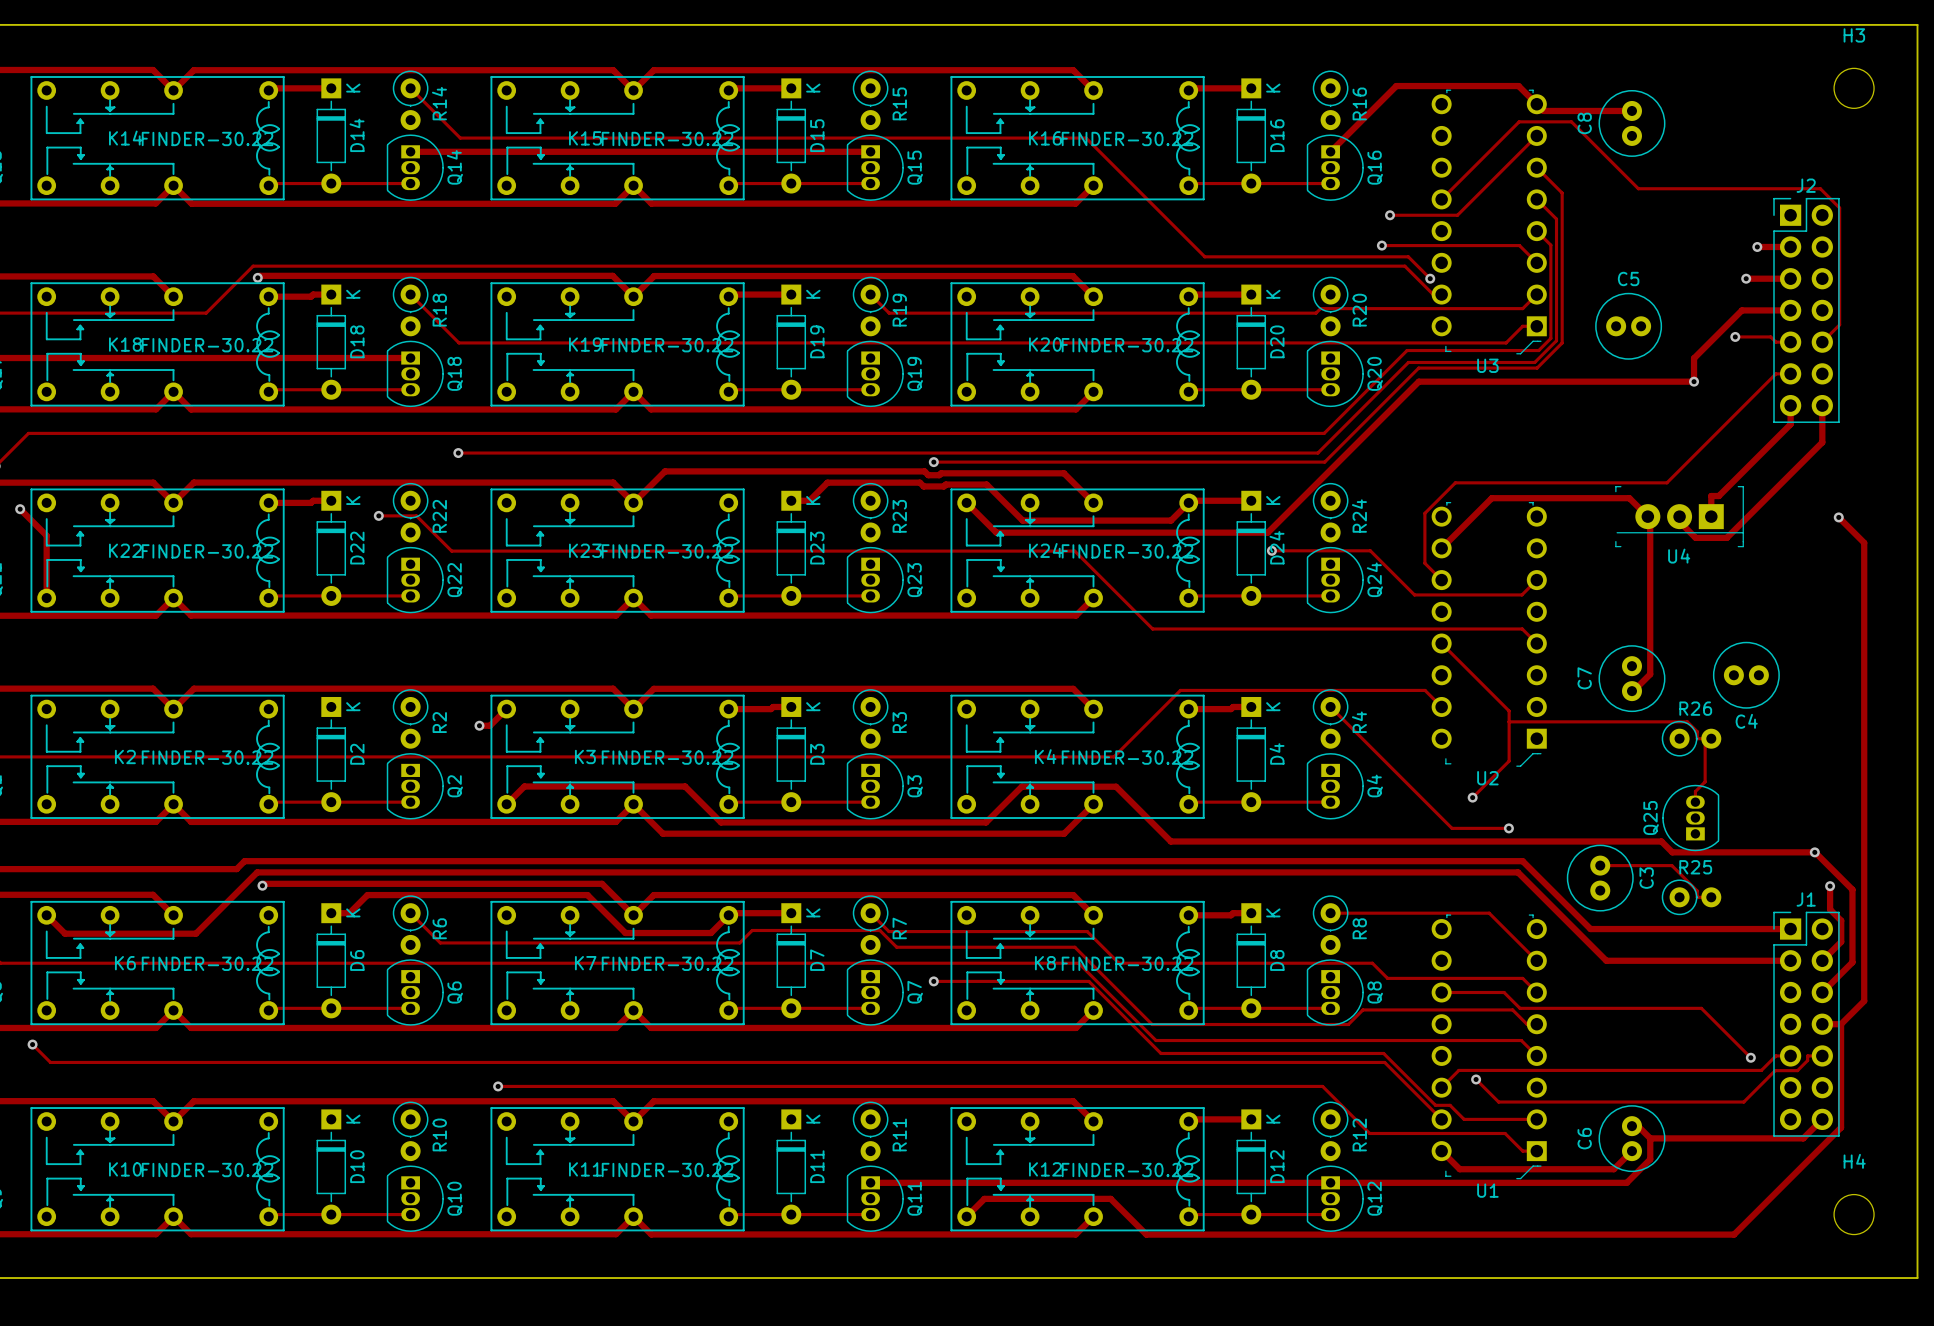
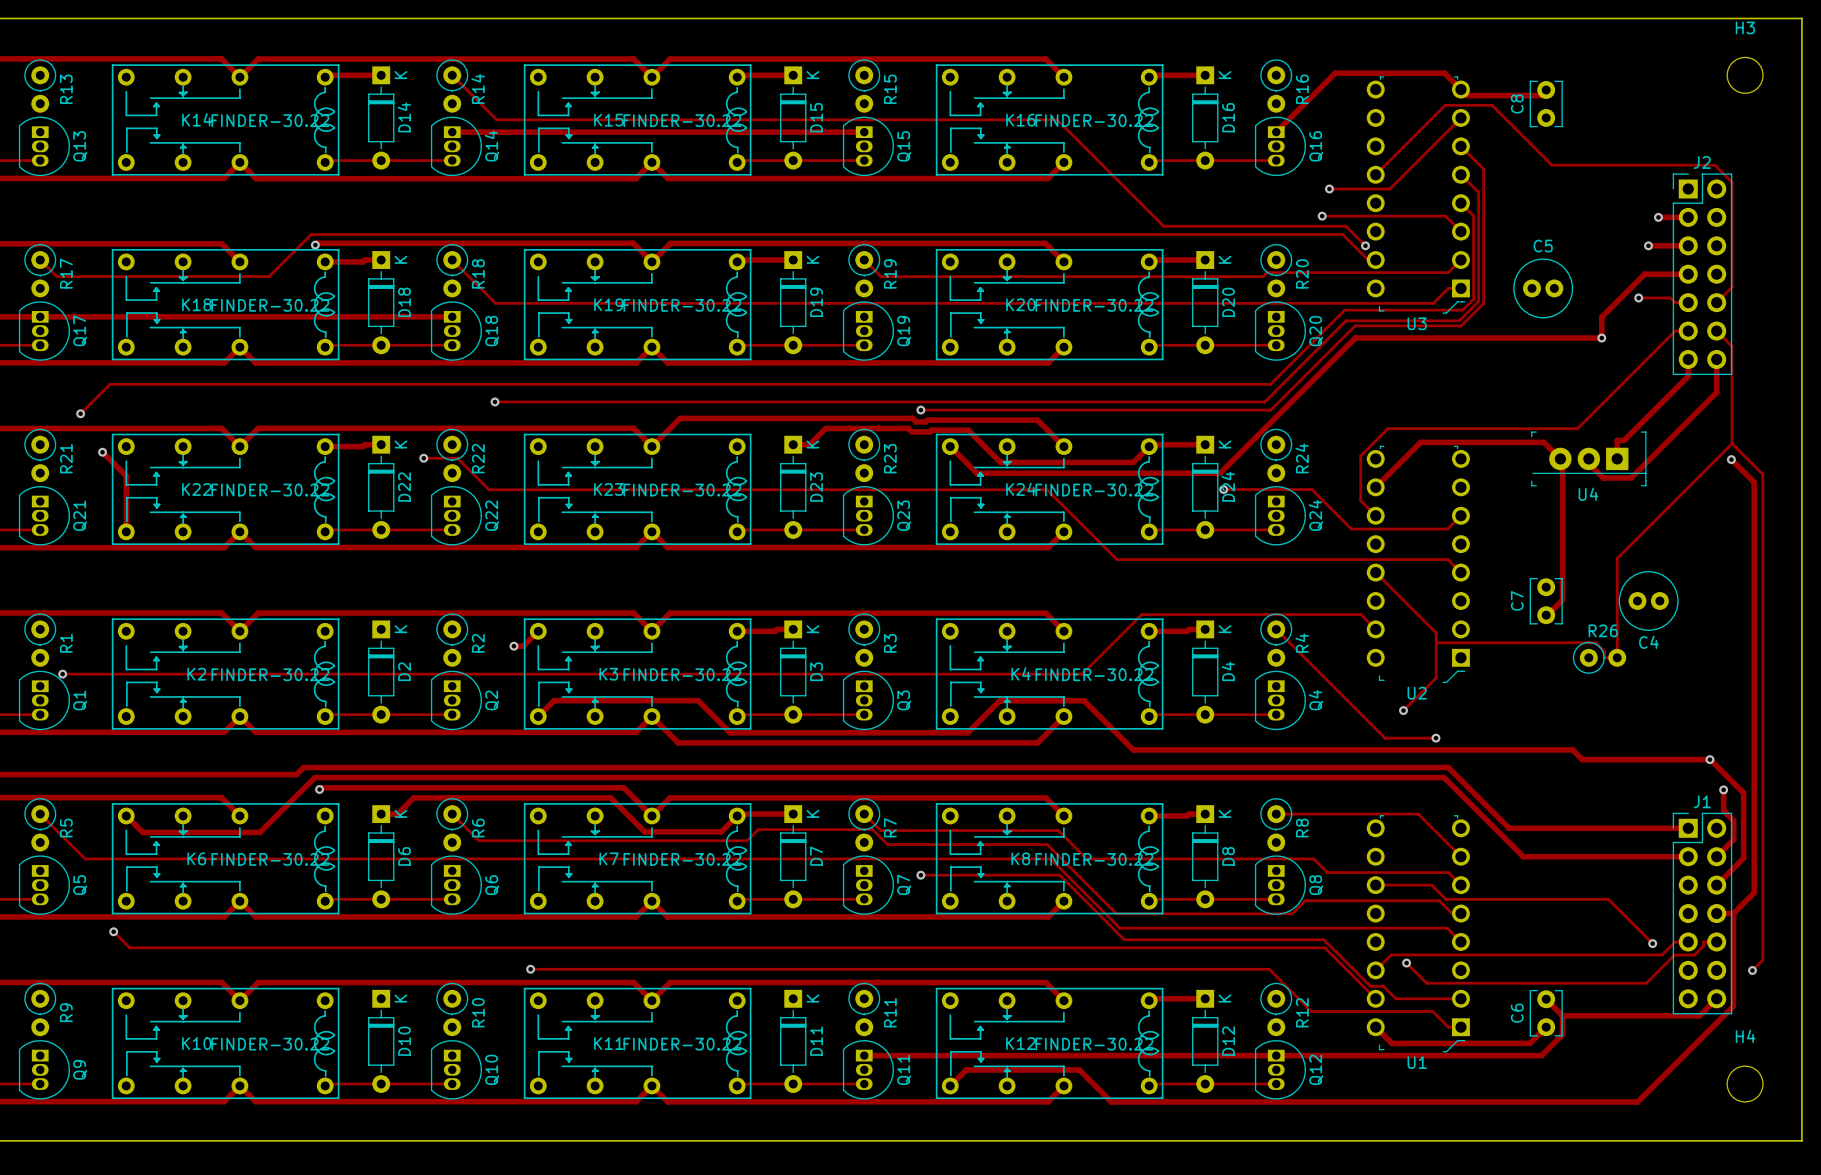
C8 footprint: [1598, 89, 1666, 157] -> [1529, 80, 1563, 128]
track: none -> (1716, 331) (1732, 346) (1732, 443)
track: none -> (1732, 443) (1617, 558) (1617, 657)
track: none -> (1732, 443) (1762, 474) (1762, 960) (1752, 970)
C7 footprint: [1598, 645, 1666, 713] -> [1529, 577, 1563, 625]
track: (1705, 738) (1705, 781) (1695, 791) (1695, 802) -> none
Q25: (1690, 818) -> none
track: (1600, 865) (1671, 865) (1697, 890) (1697, 897) (1711, 897) -> none
C3: (1600, 878) -> none
R25: (1691, 897) -> none
via: none -> (1752, 970)
C6 footprint: [1598, 1105, 1666, 1173] -> [1529, 989, 1563, 1037]

